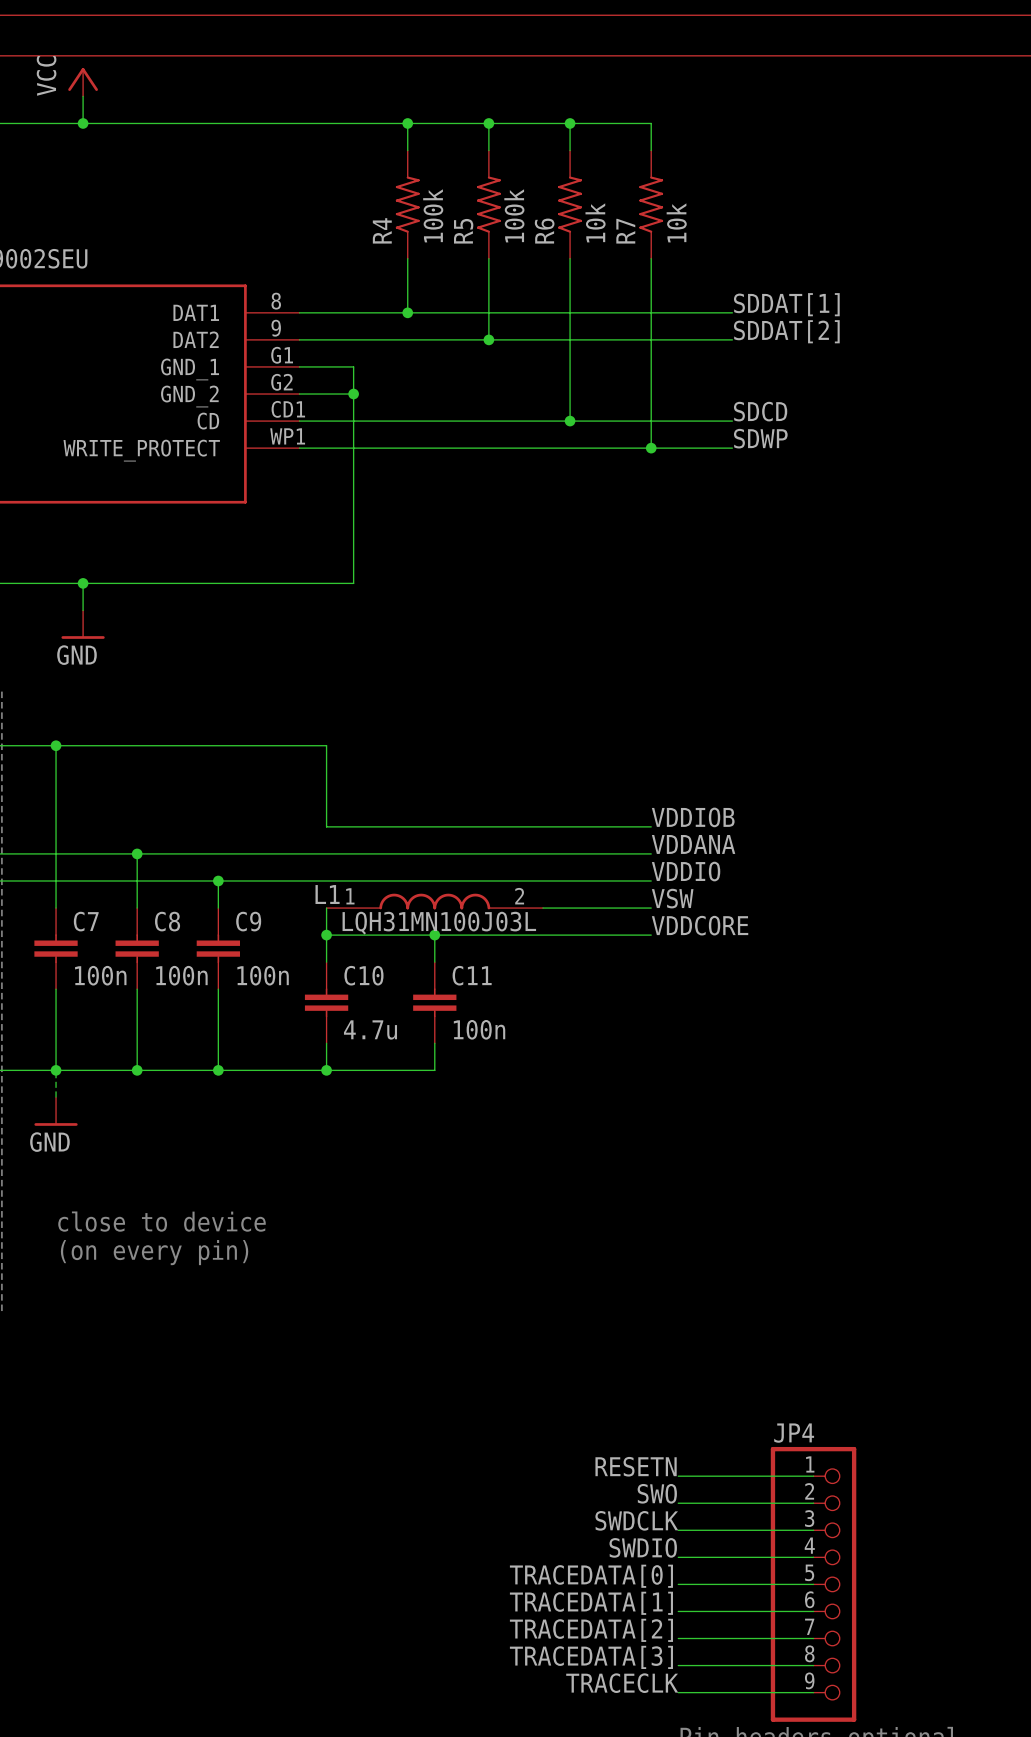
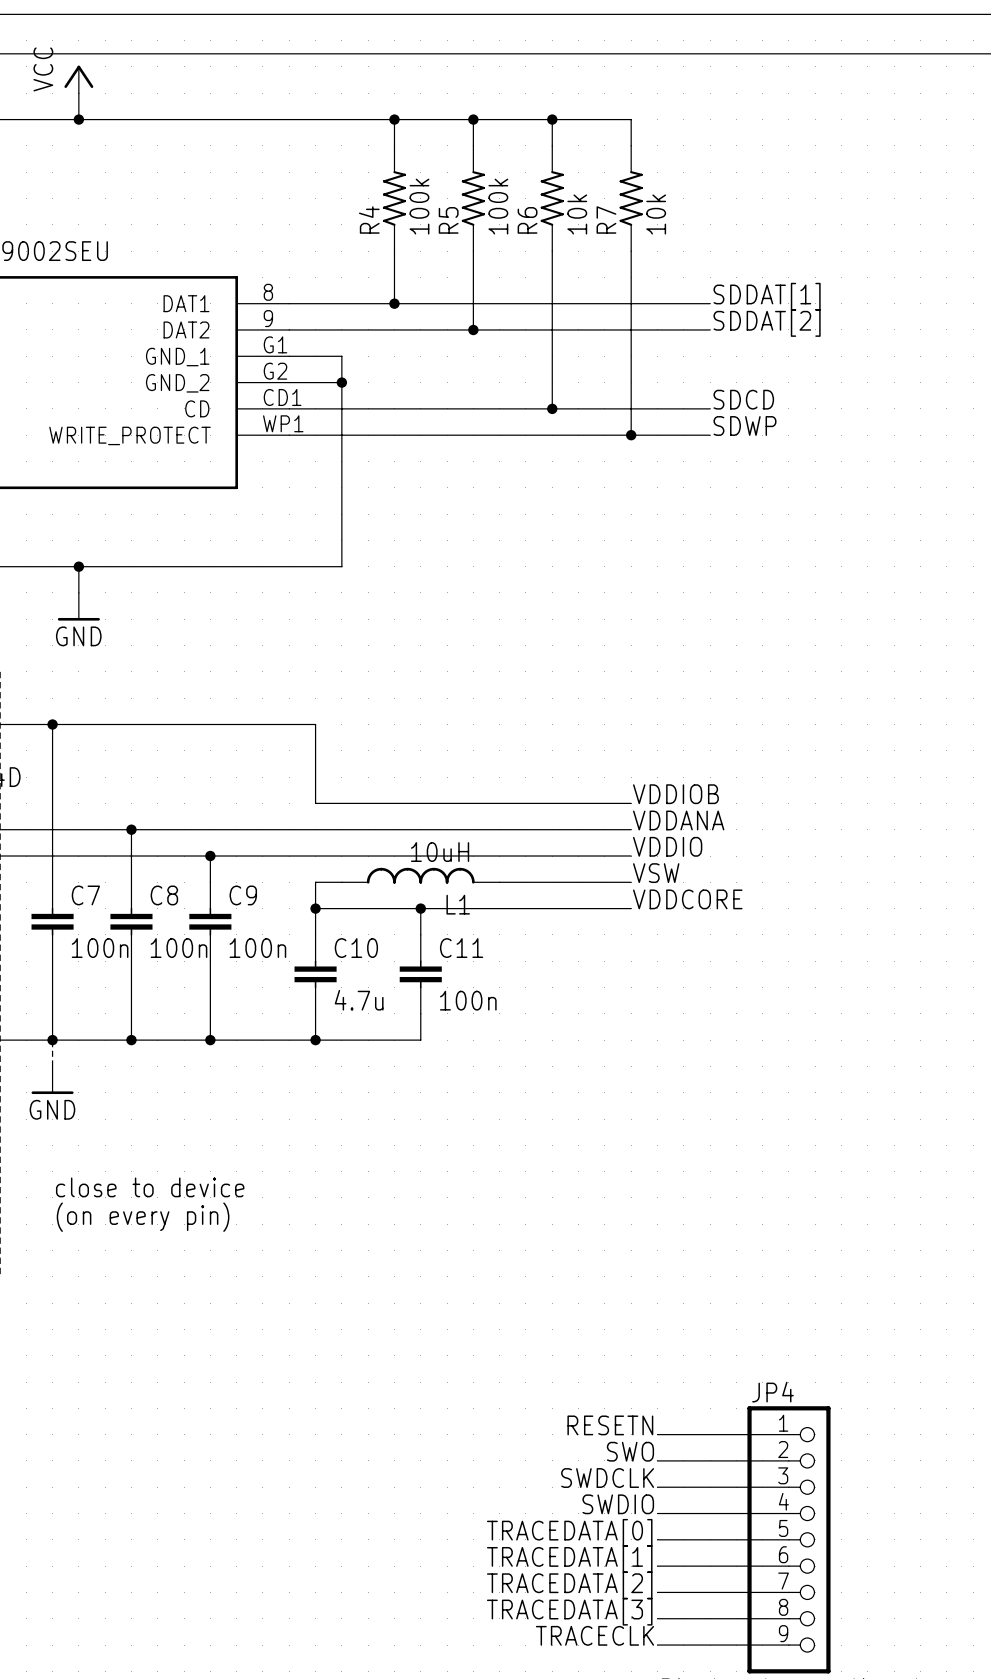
L1 symbol: [326, 893, 544, 910] -> [341, 867, 500, 884]
L1 name position: L1 (327, 894) -> L1 (458, 904)
L1 value: LQH31MN100J03L (439, 923) -> 10uH (440, 852)

